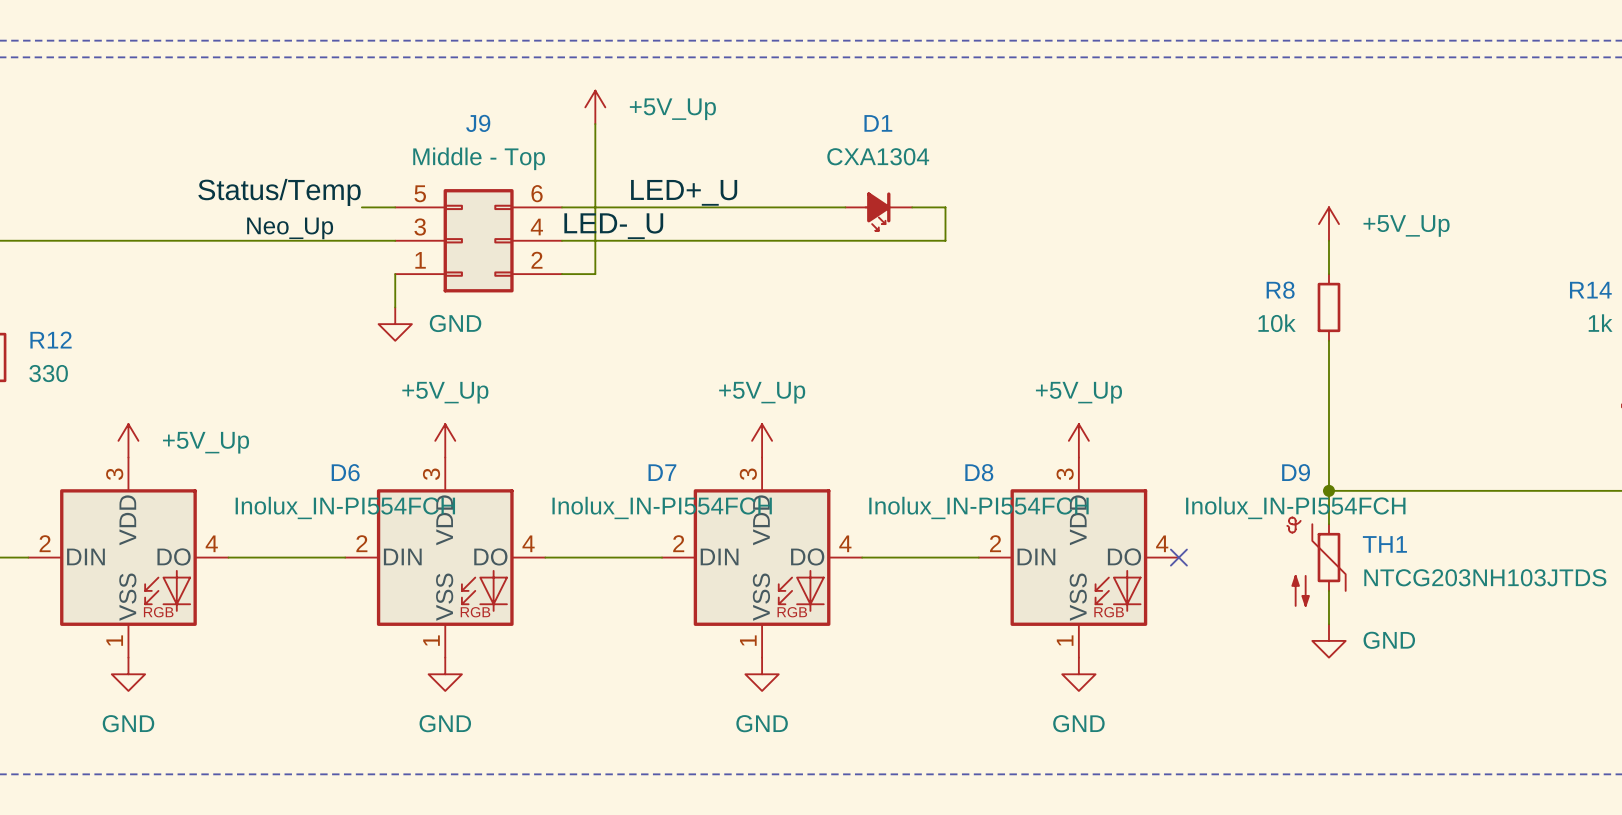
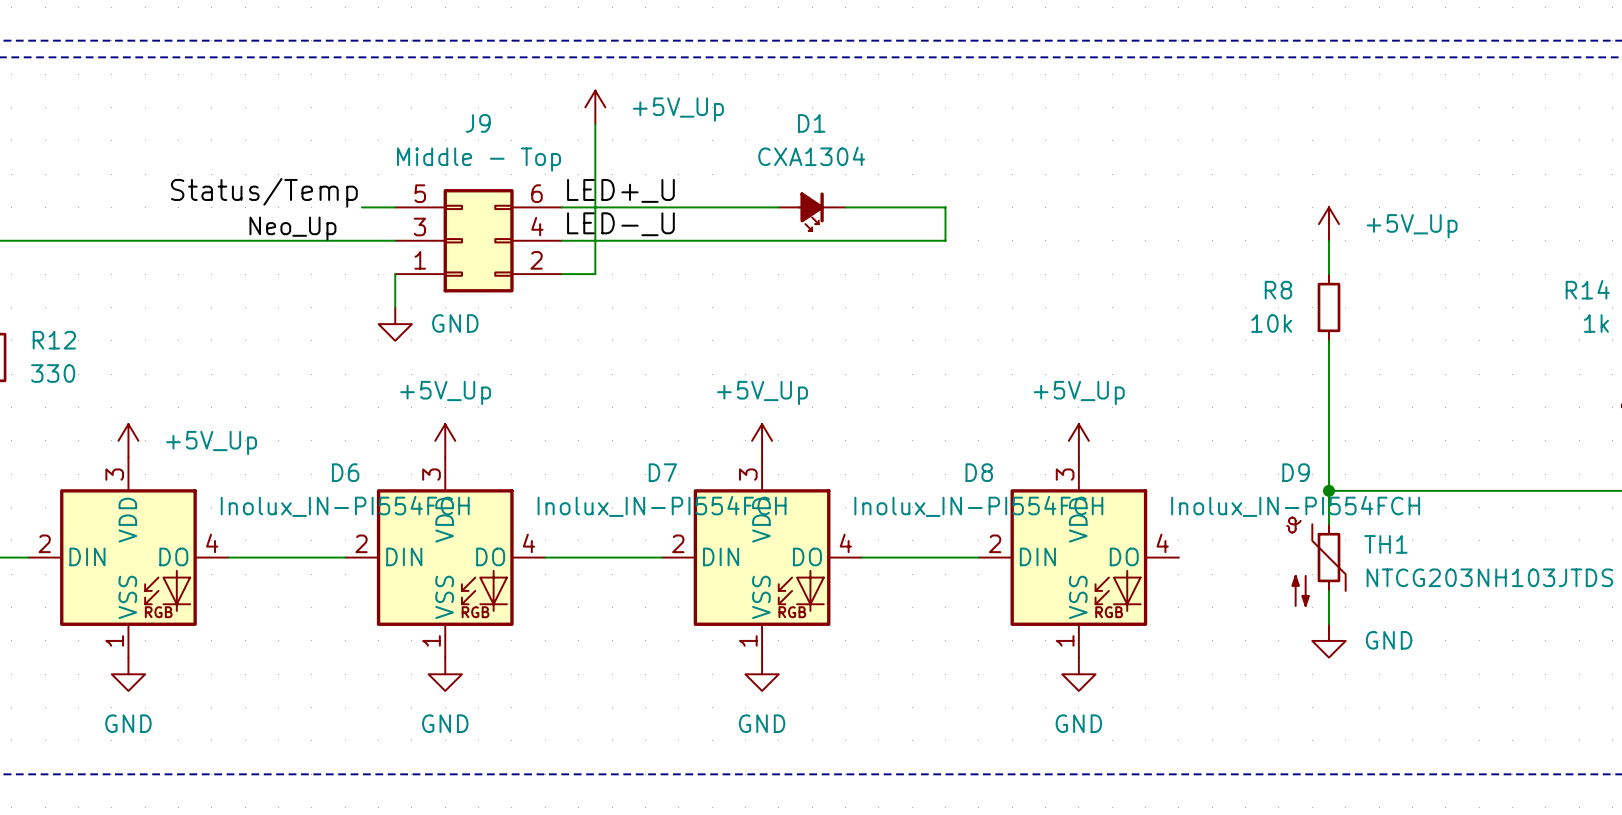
label position: LED+_U (684, 192) -> LED+_U (620, 190)
D1 position: (878, 211) -> (812, 211)
no-connect mark: (1178, 557) -> none

